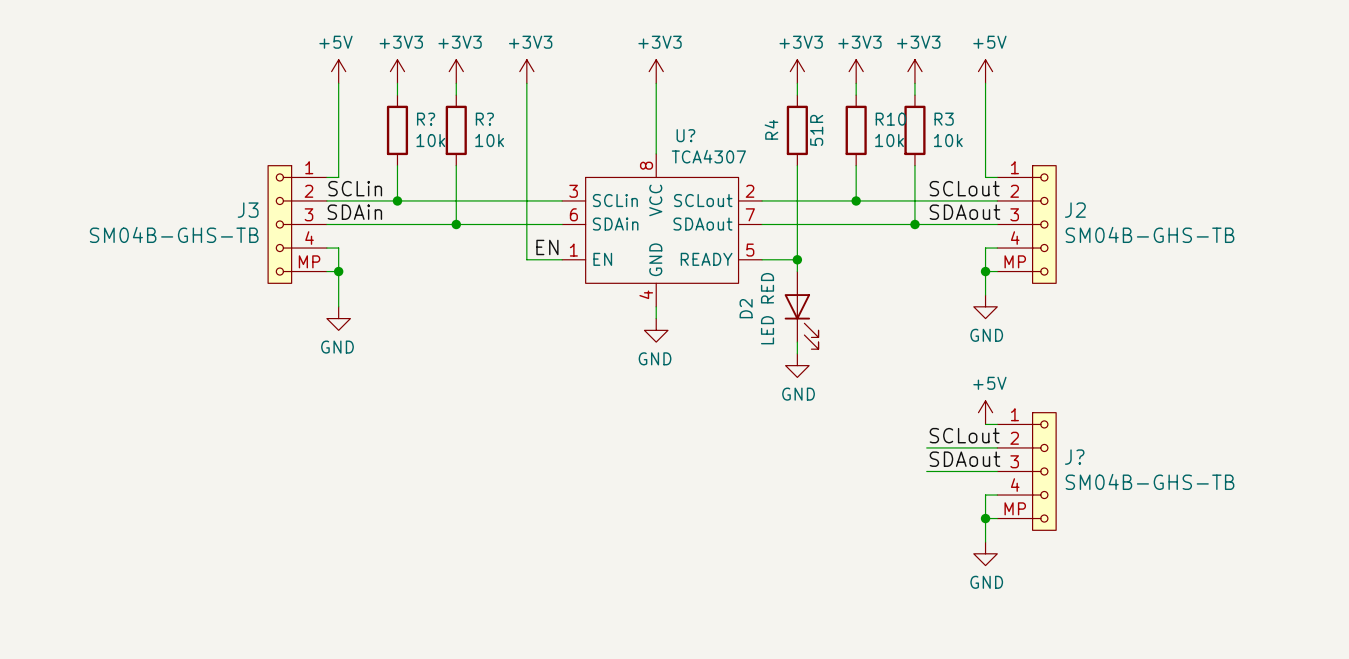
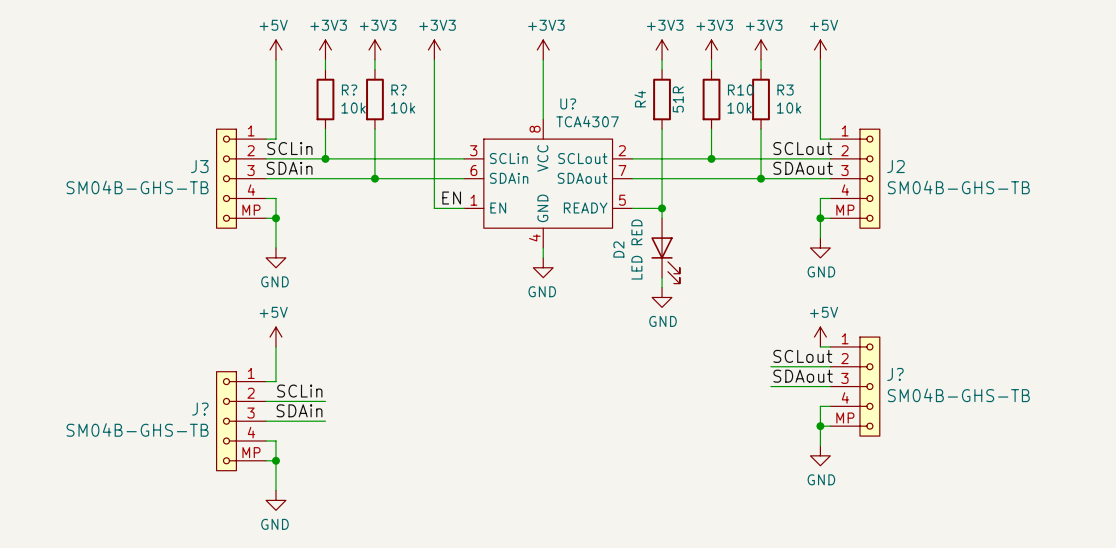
power symbol: none -> +5V (275, 337)
wire: none -> (275, 346) (275, 381) (266, 381)
label: none -> SCLin (299, 391)
wire: none -> (266, 401) (325, 401)
label: none -> SDAin (299, 410)
J?: none -> SM04B-GHS-TB (241, 421)
wire: none -> (266, 421) (325, 421)
wire: none -> (266, 441) (275, 441) (275, 490)
wire: none -> (266, 460) (275, 460)
junction: none -> (275, 460)
power symbol: none -> GND (275, 500)

